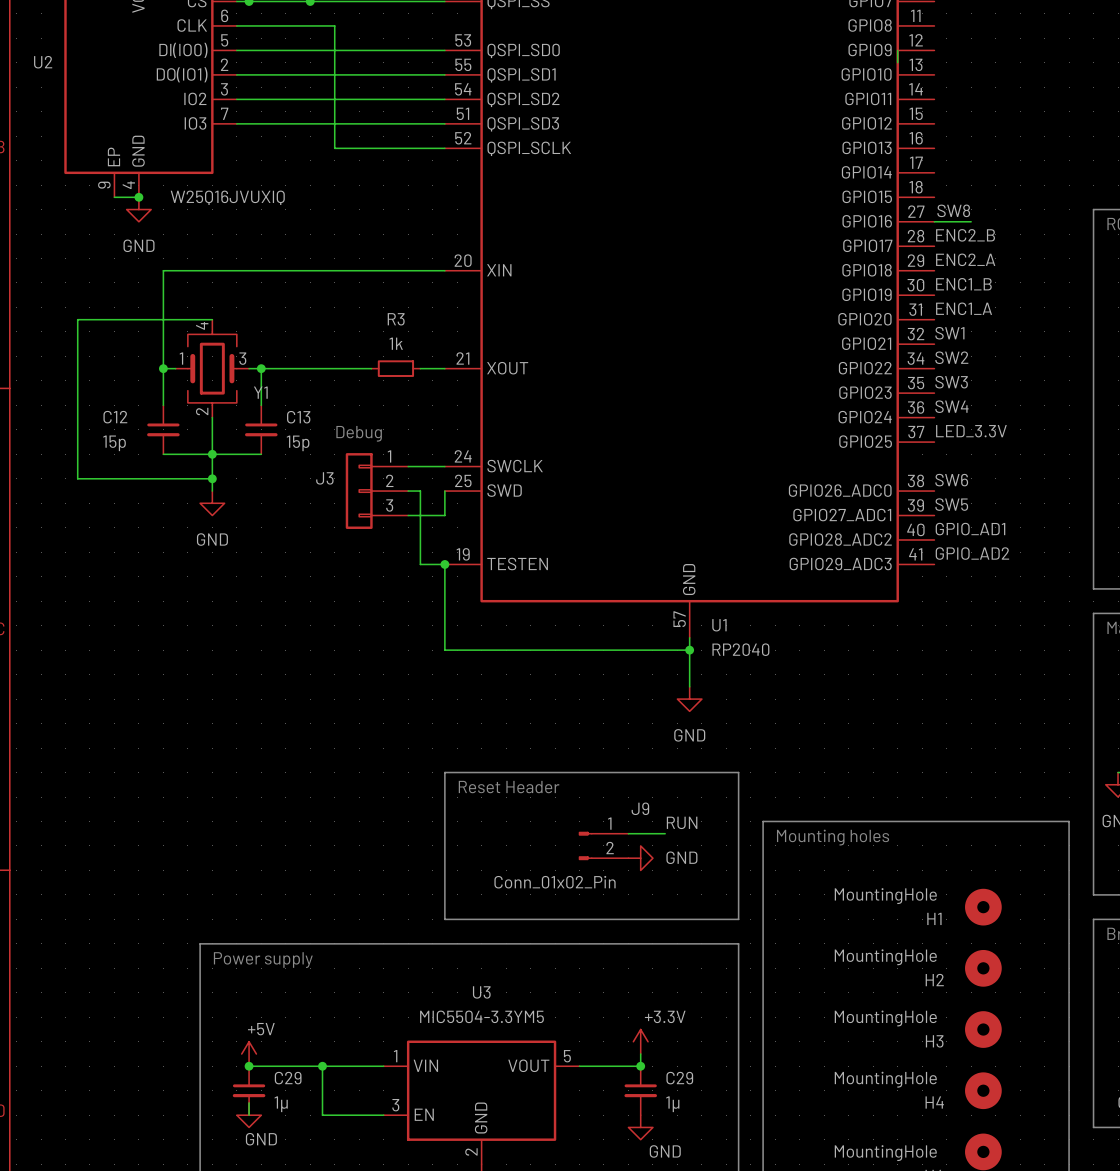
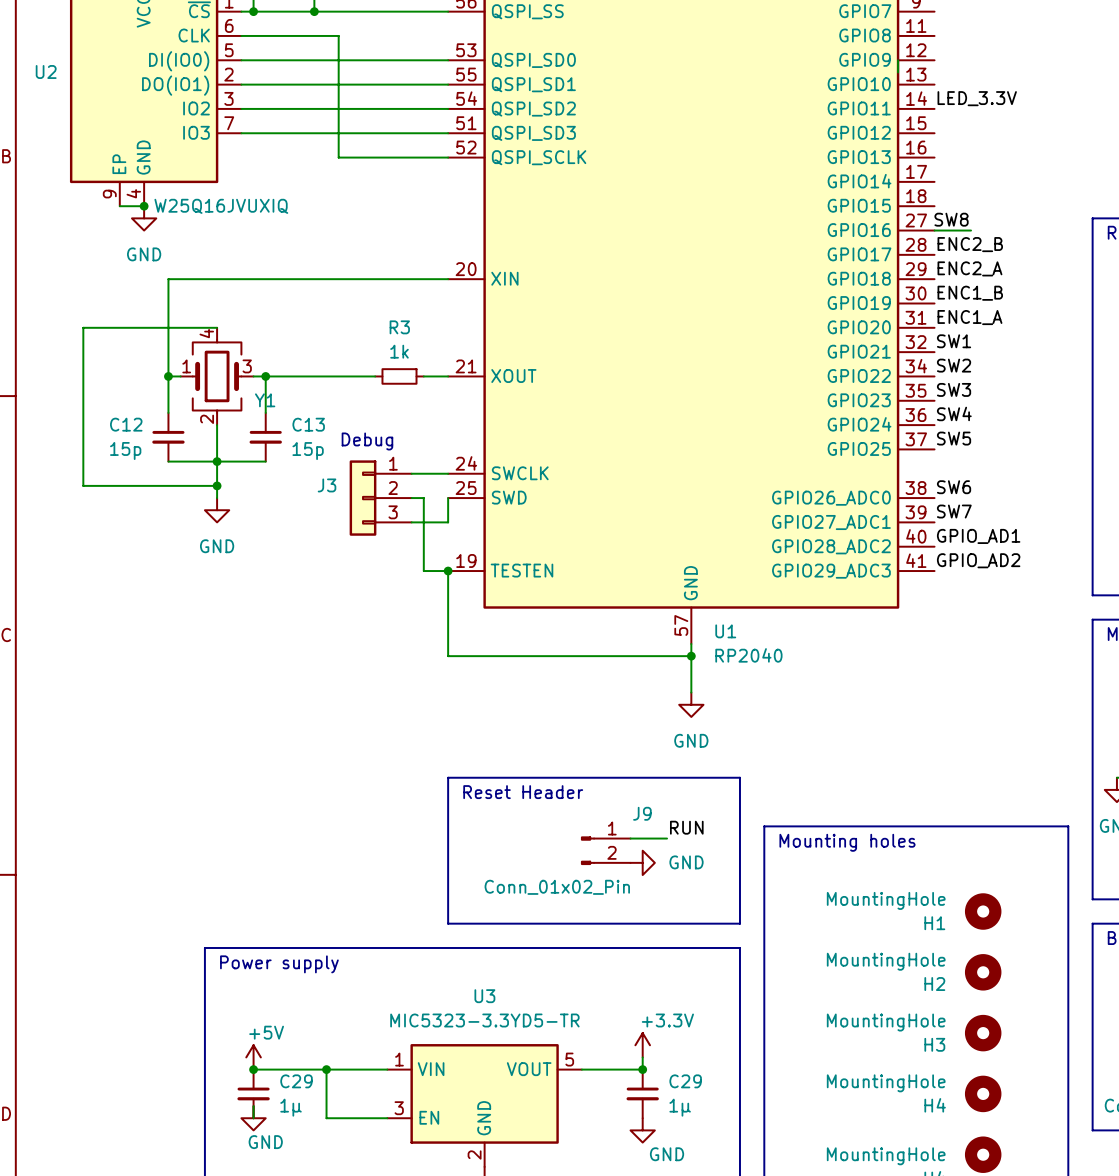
label: none -> LED_3.3V (977, 98)
label: LED_3.3V (971, 431) -> SW5 (954, 438)
label: SW5 (951, 504) -> SW7 (954, 511)
U3 value: MIC5504-3.3YM5 (481, 1016) -> MIC5323-3.3YD5-TR (484, 1020)

